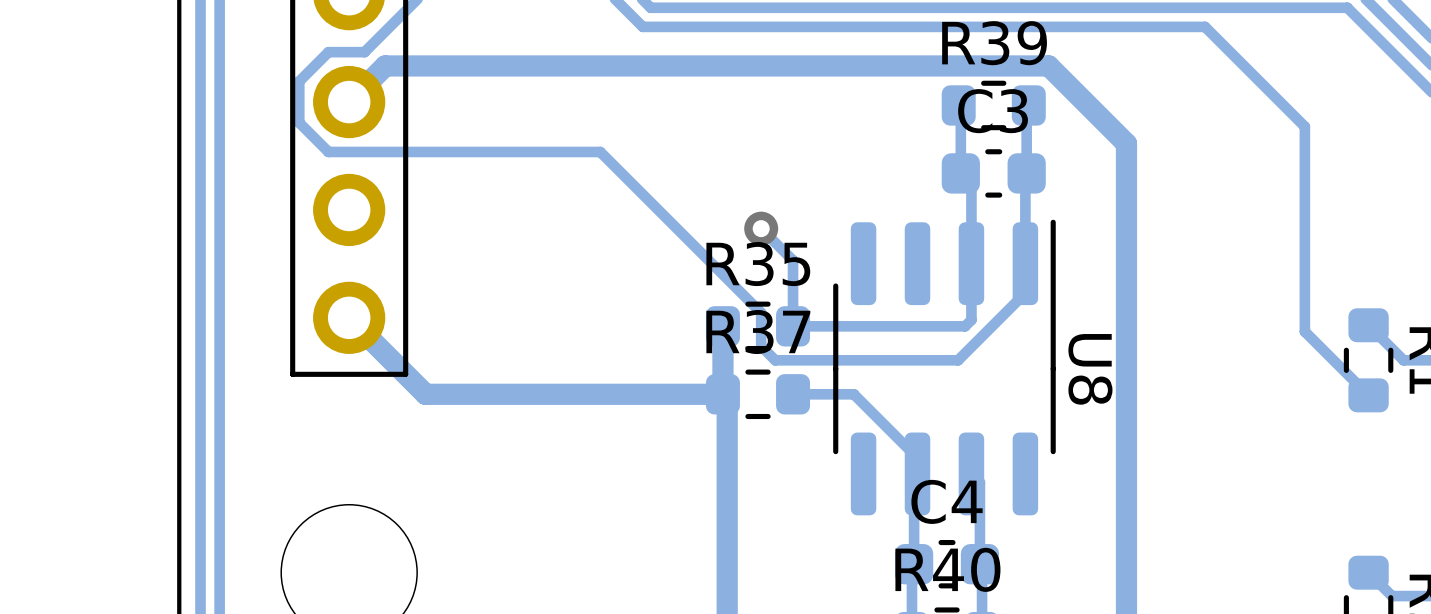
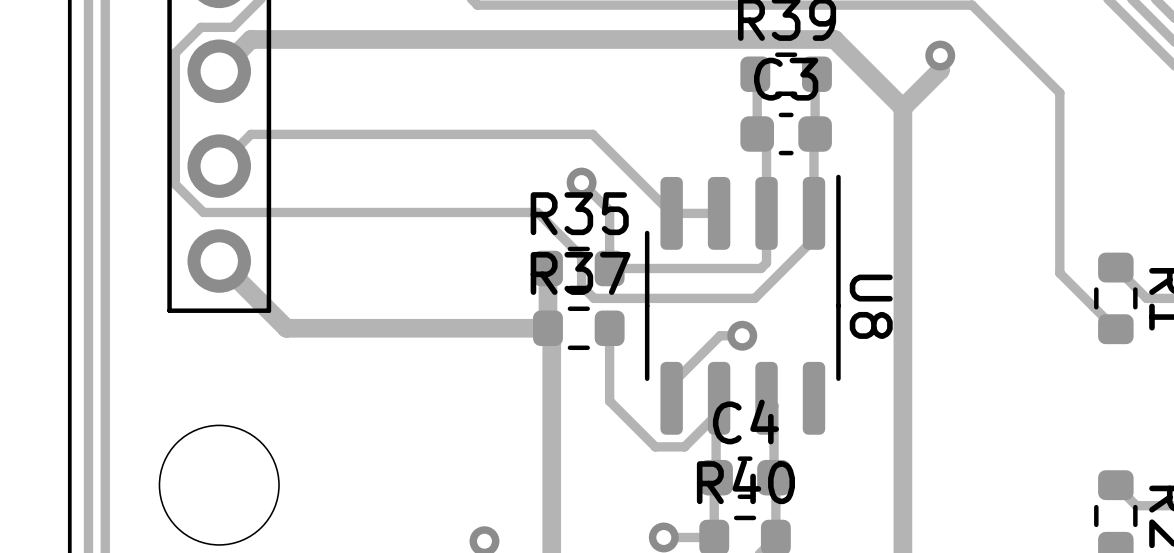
track: none -> (940, 55) (940, 70) (902, 107)
via: none -> (940, 55)
track: (299, 122) (328, 151) (600, 151) (710, 262) -> (175, 89) (175, 184) (203, 212) (537, 212)
track: none -> (219, 166) (250, 134) (592, 134) (671, 213) (719, 213)
track: (793, 394) (853, 394) (917, 457) -> (609, 328) (609, 401) (655, 446) (684, 446) (719, 412) (719, 398)
track: none -> (742, 335) (720, 335) (671, 384) (671, 398)
via: none -> (742, 335)

